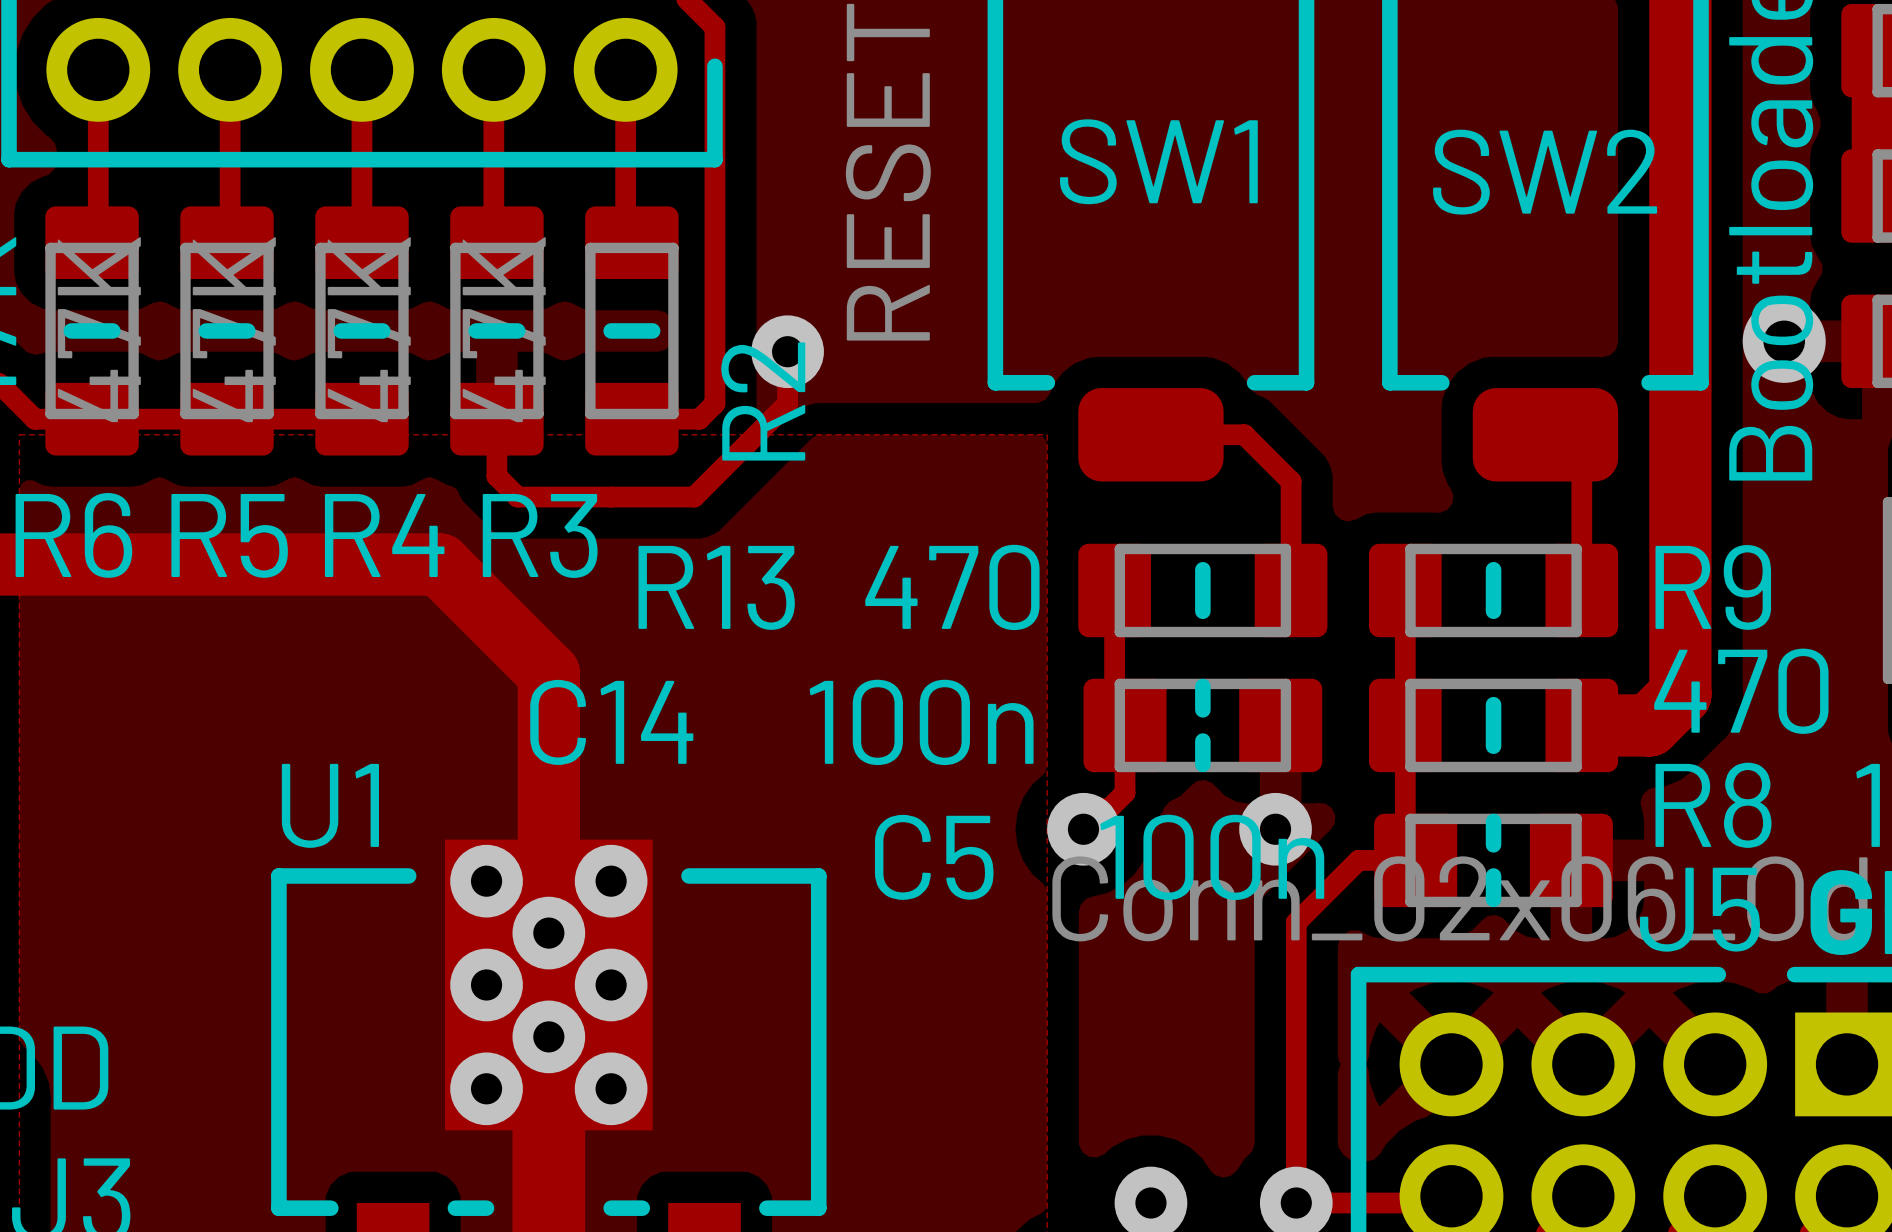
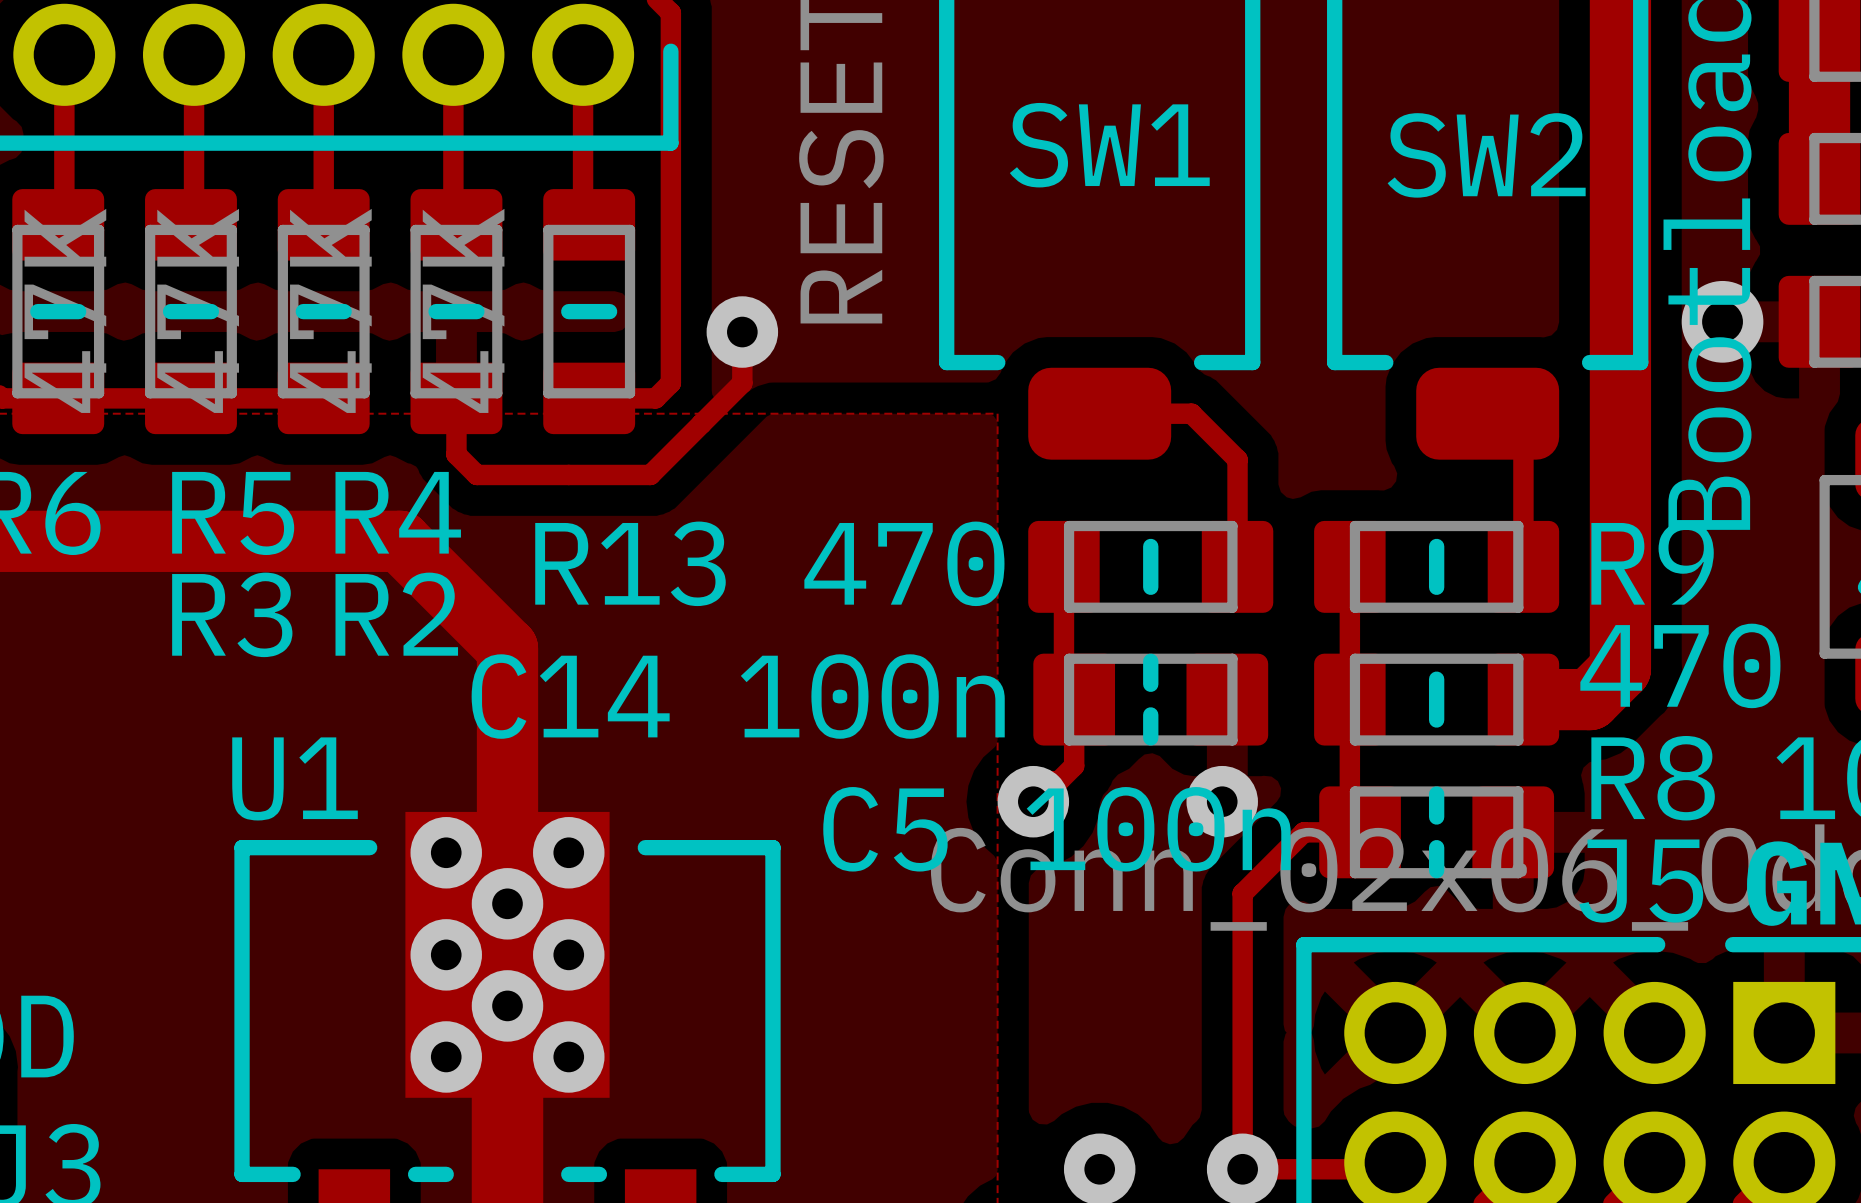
R2 name rotation: 0° (763, 401) -> 90° clockwise (396, 614)
R2 name position: R2 (763, 401) -> R2 (396, 614)
R5 name position: R5 (229, 535) -> R5 (233, 513)
R4 name position: R4 (384, 535) -> R4 (398, 512)
R3 name position: R3 (540, 535) -> R3 (232, 614)
R13 name position: R13 (716, 587) -> R13 (630, 563)

